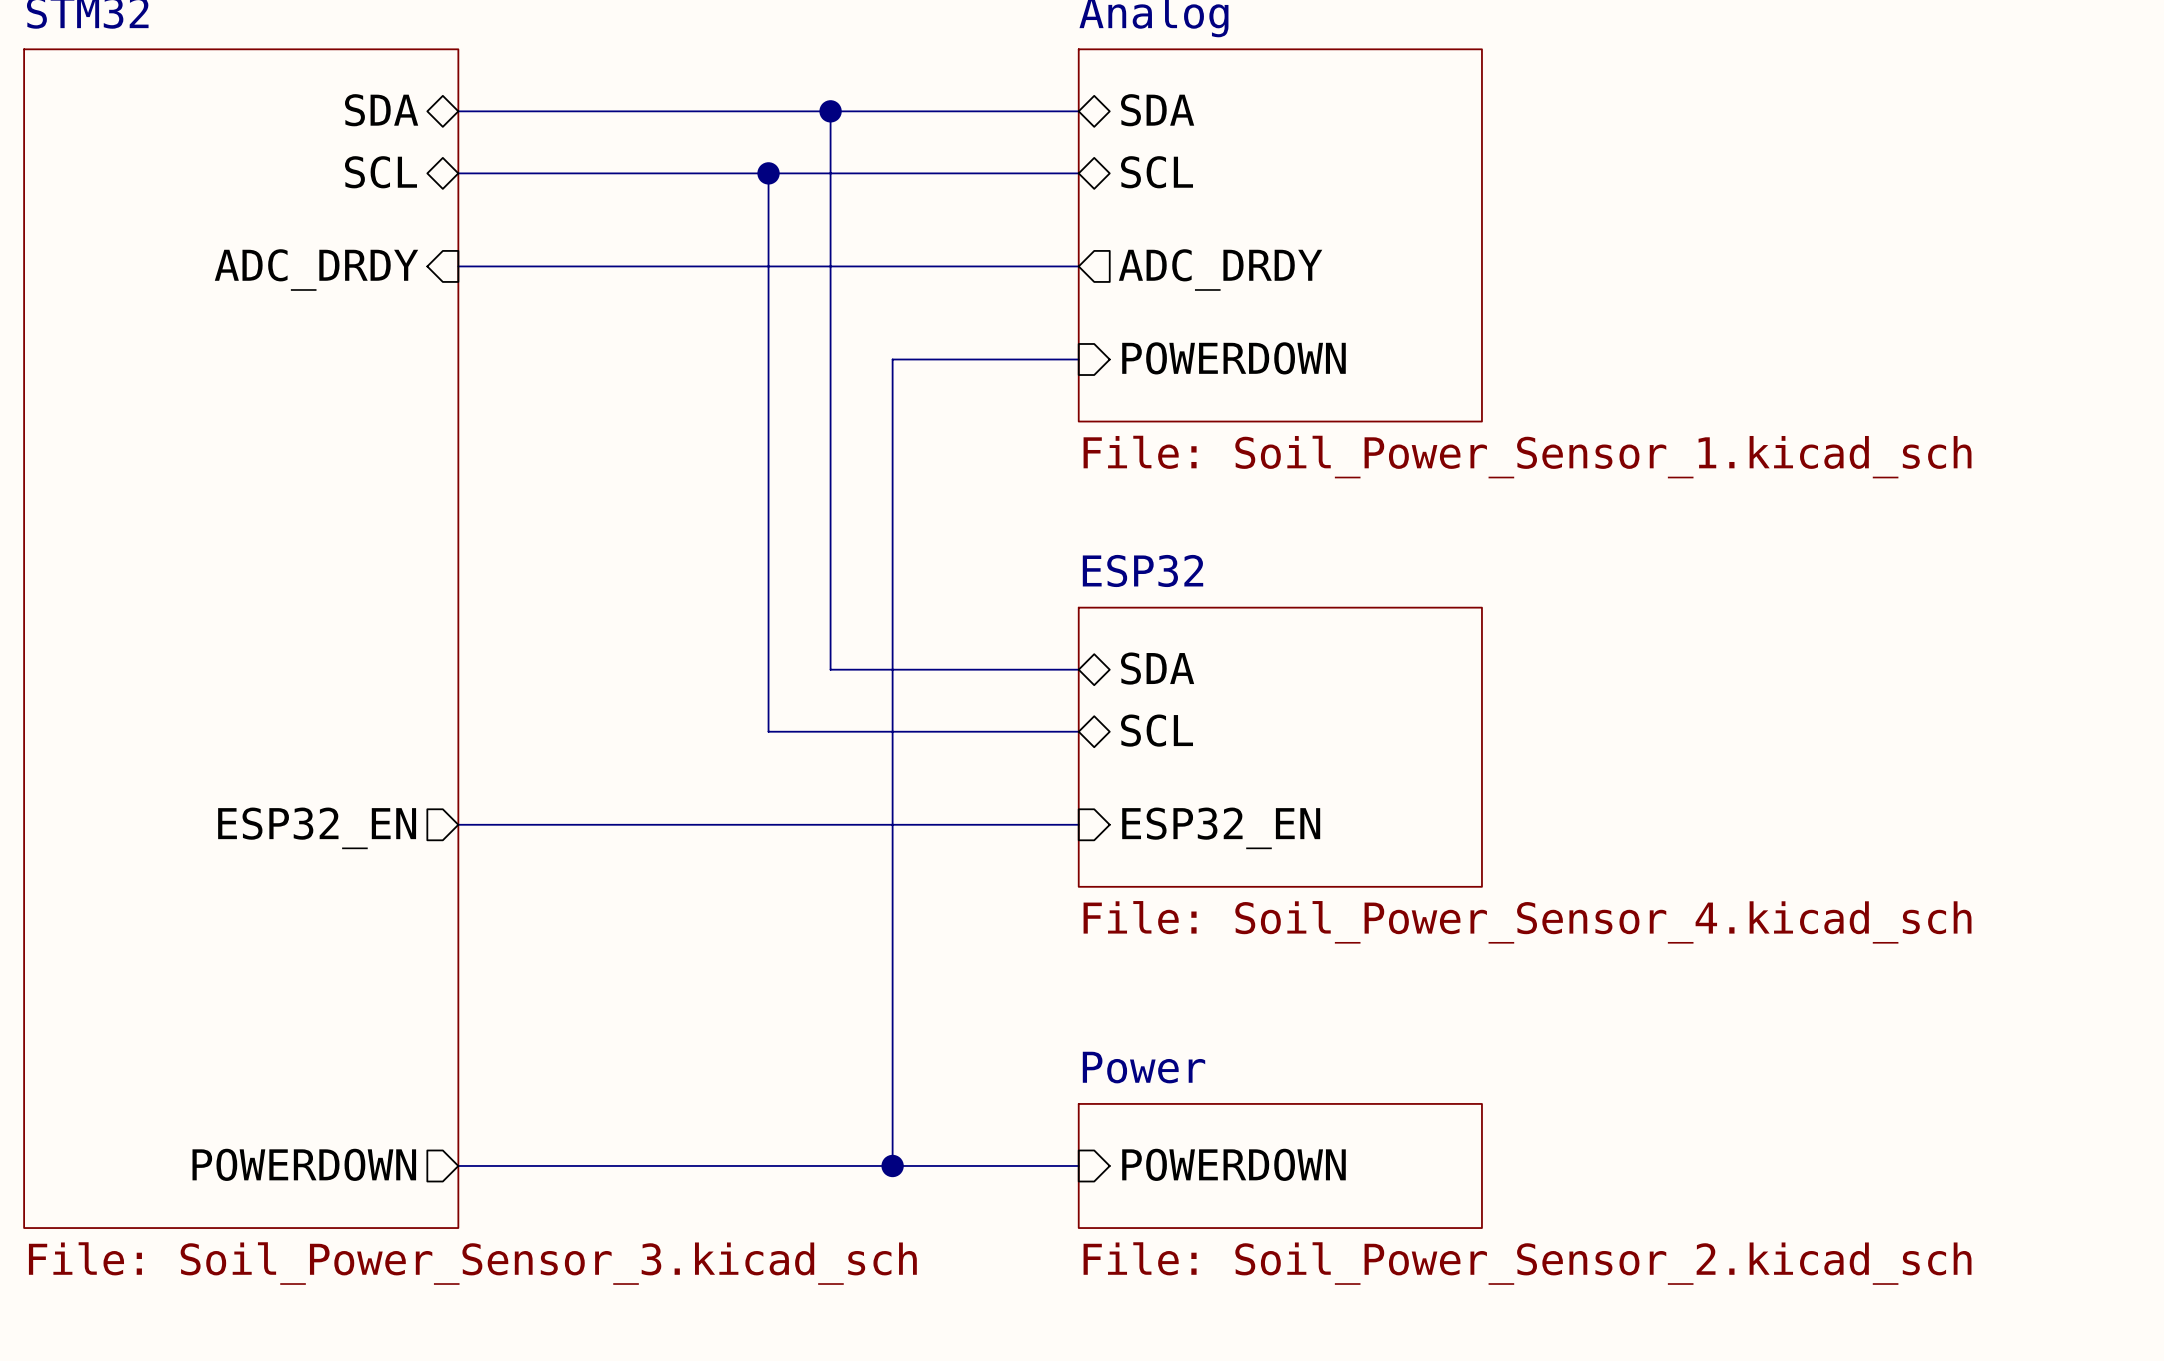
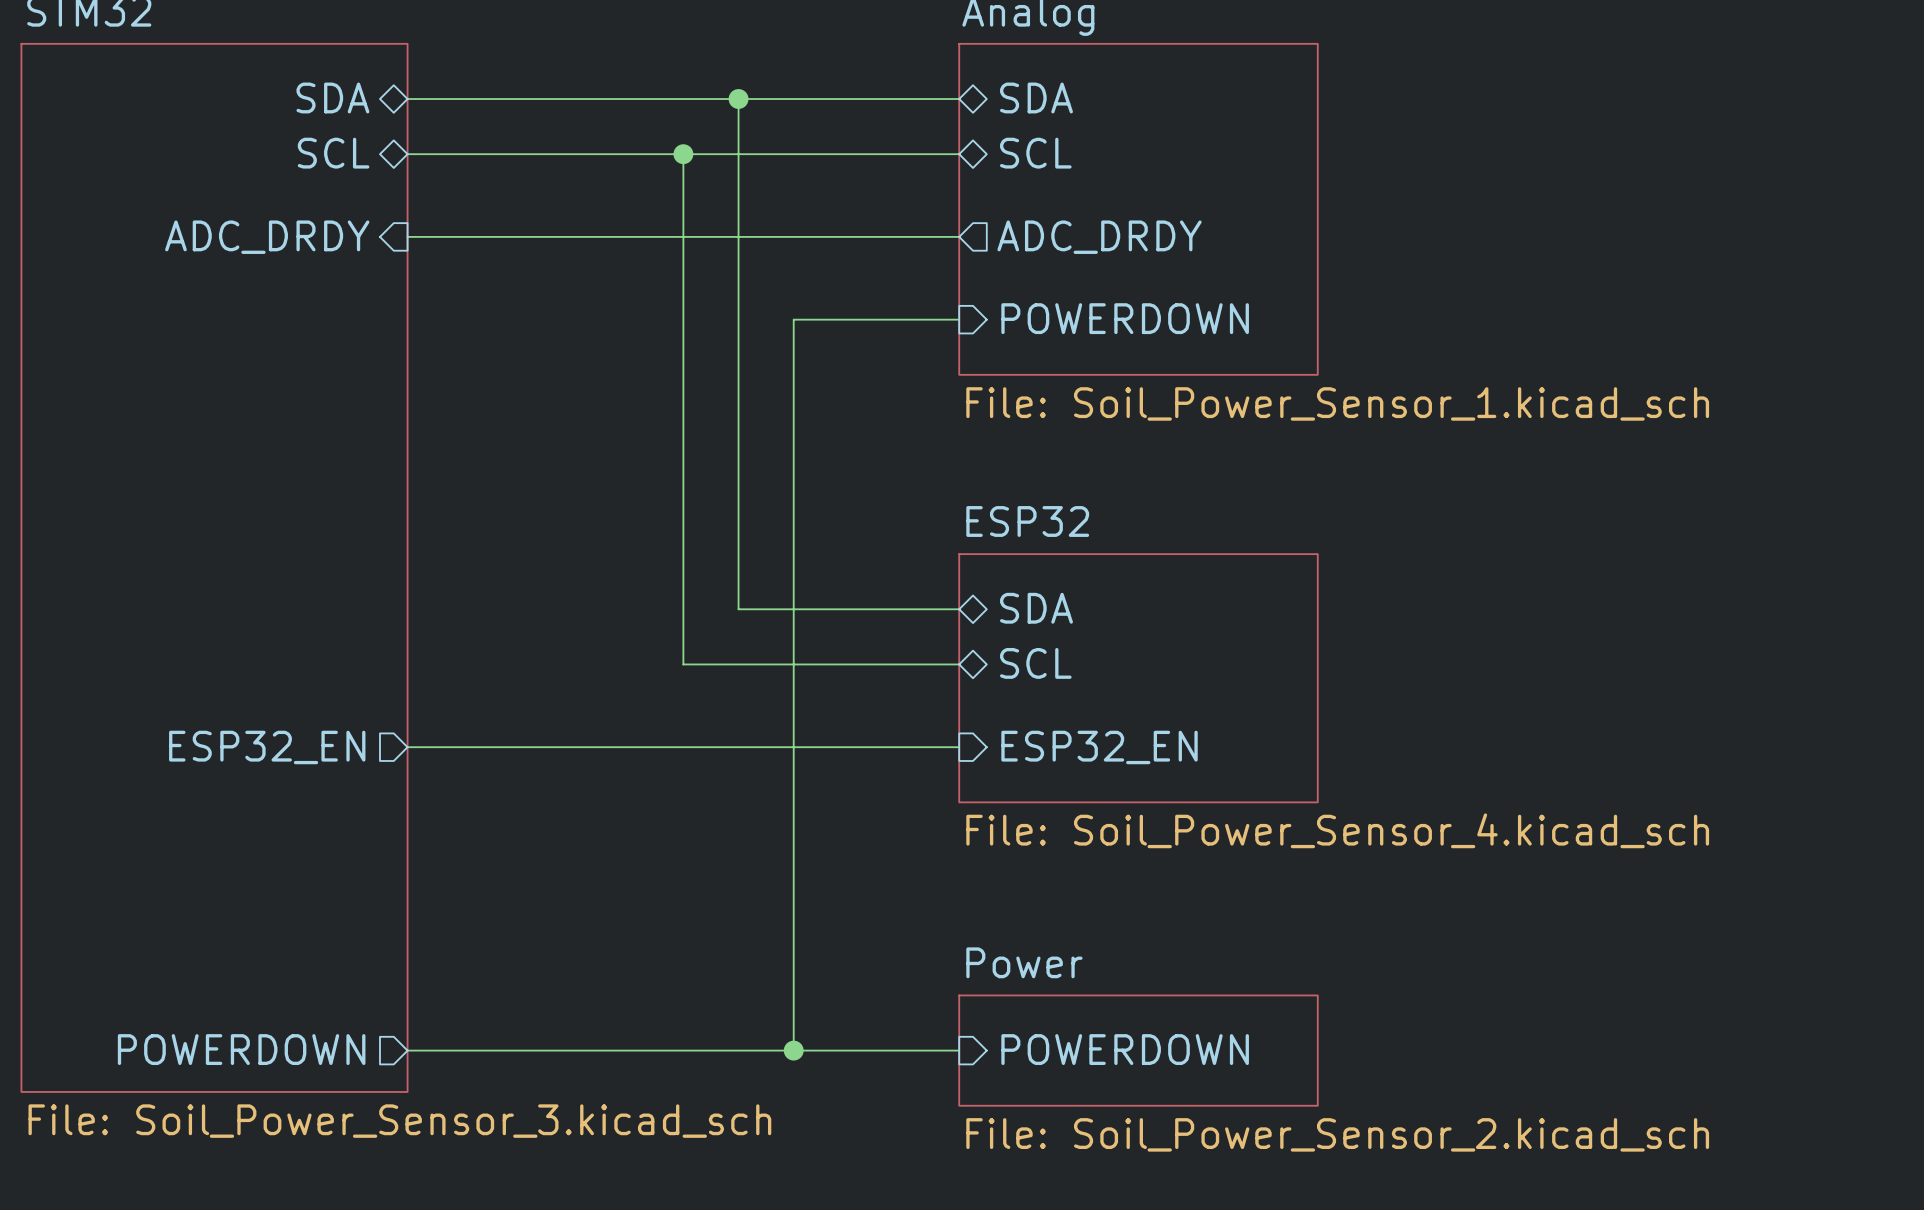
sheet pin position: SDA (1157, 668) -> SDA (1036, 608)
wire: (830, 669) (1078, 669) -> (738, 595) (738, 609) (959, 609)
sheet pin position: SCL (1157, 730) -> SCL (1035, 663)
wire: (768, 731) (1078, 731) -> (683, 650) (683, 664) (959, 664)
sheet ESP32 position: (1280, 747) -> (1138, 678)
wire: (458, 824) (1078, 824) -> (407, 747) (959, 747)
sheet pin position: ESP32_EN (317, 828) -> ESP32_EN (267, 747)
sheet pin position: ESP32_EN (1221, 828) -> ESP32_EN (1099, 747)
sheet pin position: POWERDOWN (304, 1164) -> POWERDOWN (241, 1049)
sheet pin position: POWERDOWN (1233, 1164) -> POWERDOWN (1125, 1049)
wire: (458, 1165) (1078, 1165) -> (407, 1050) (959, 1050)
junction position: (892, 1165) -> (793, 1050)
sheet Power position: (1280, 1165) -> (1138, 1050)

